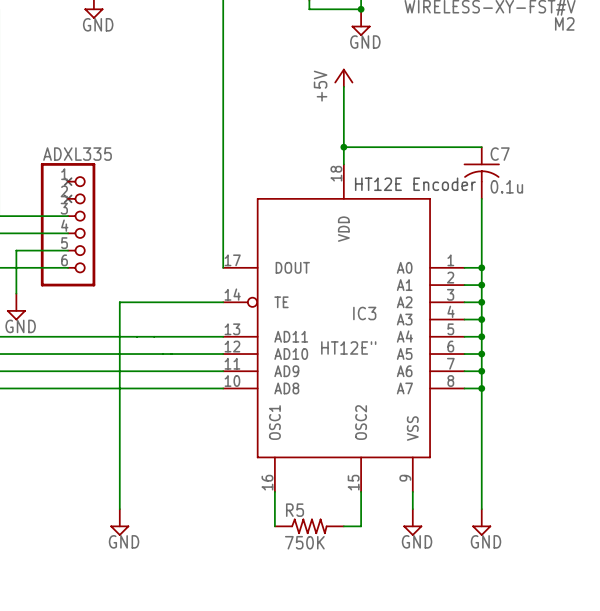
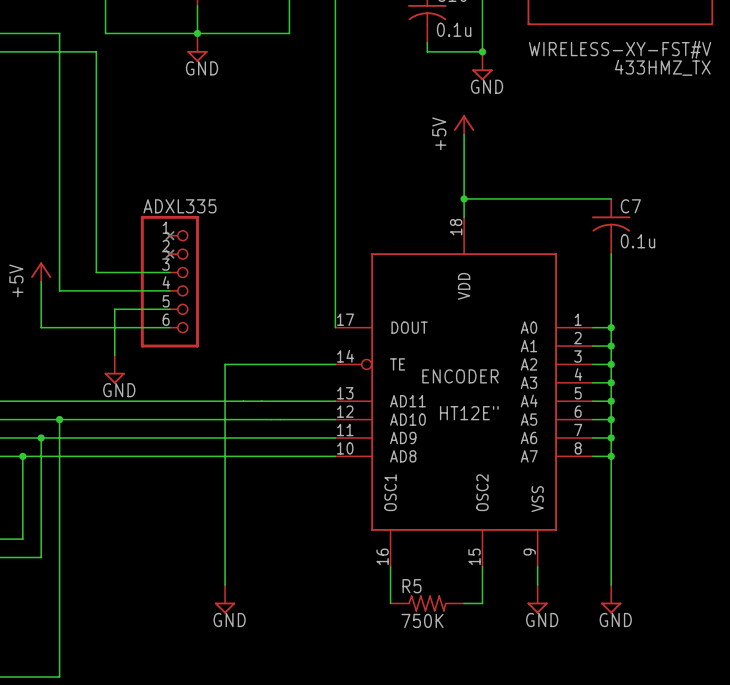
M2 name: M2 (564, 23) -> 433HMZ_TX (662, 67)
text: HT12E Encoder (415, 184) -> none
IC3 name: IC3 (364, 313) -> ENCODER (460, 376)

